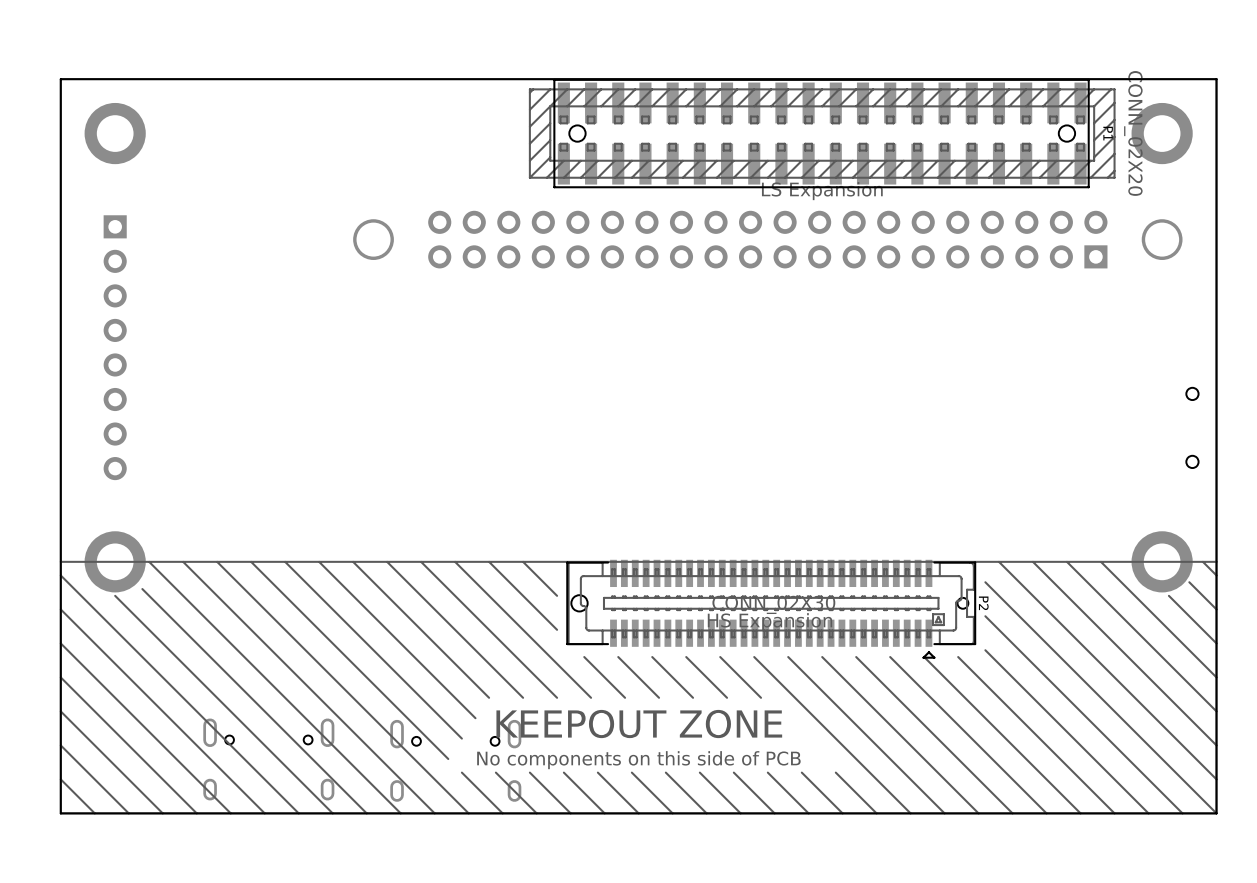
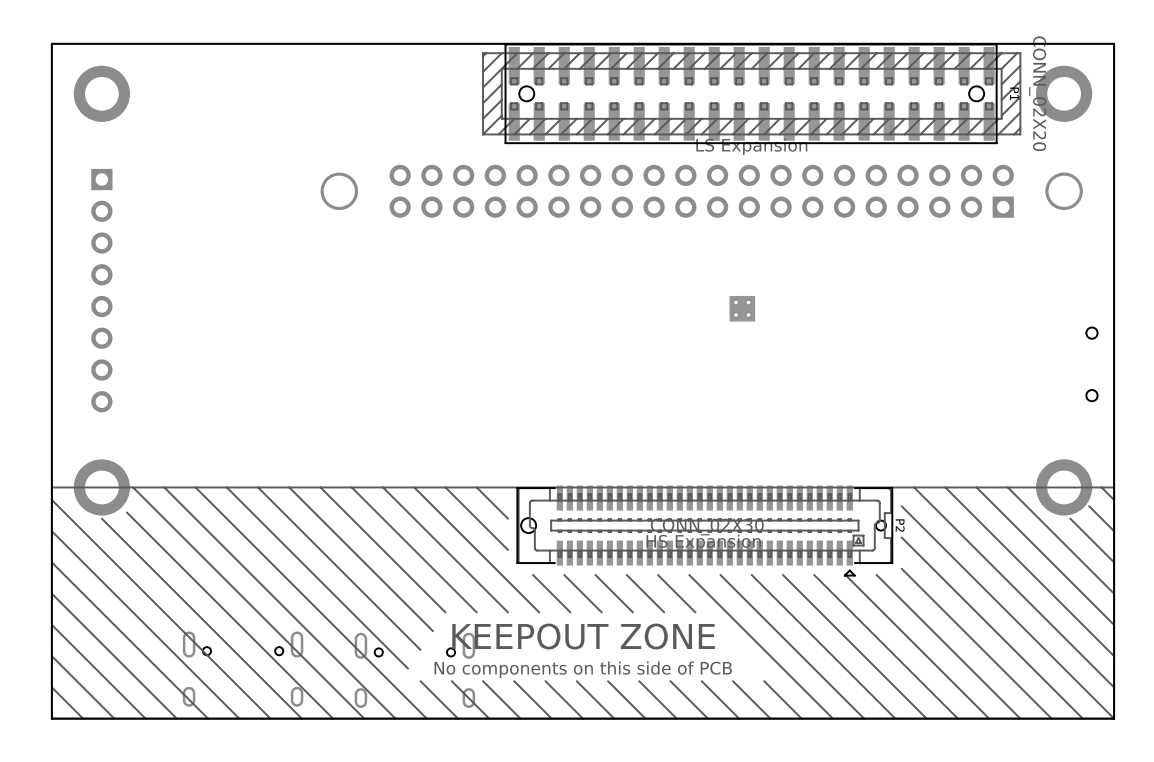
part: none -> (742, 308)

